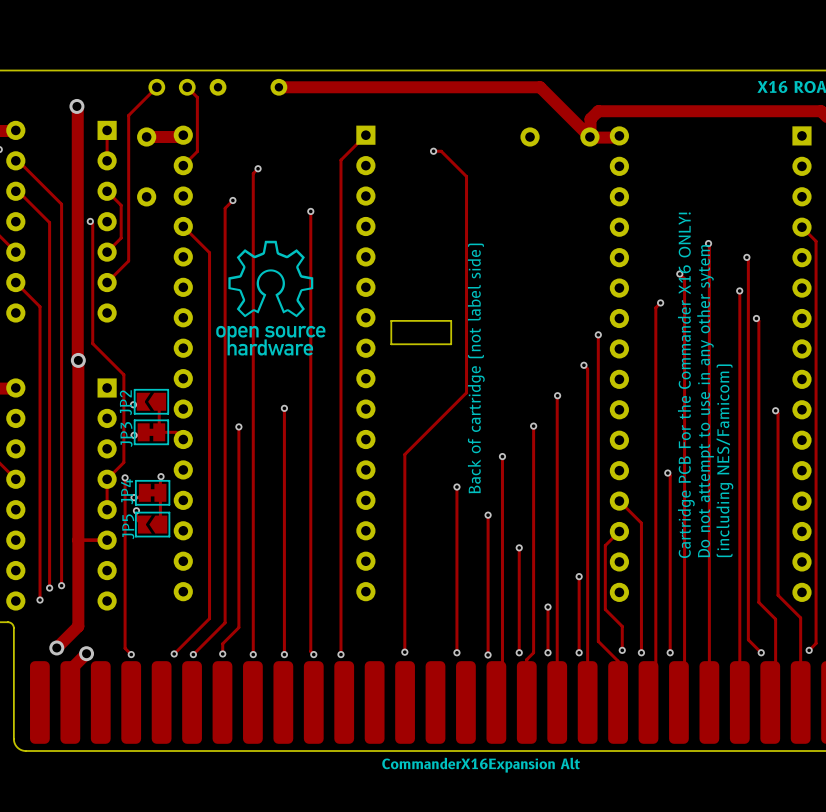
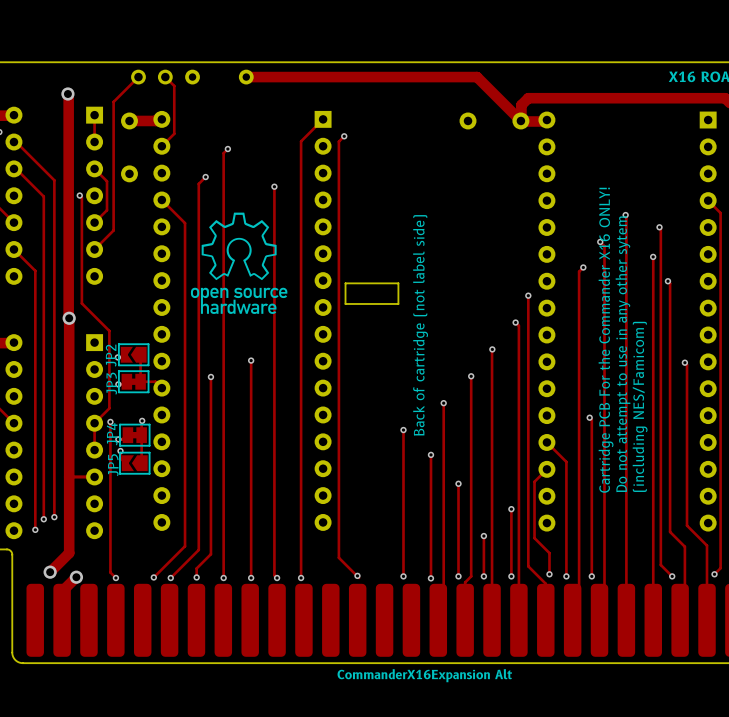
track: (433, 151) (441, 151) (466, 176) (466, 392) (404, 454) (404, 652) -> none
via position: (433, 151) -> (344, 136)
track: none -> (344, 136) (338, 141) (338, 557) (359, 577)

